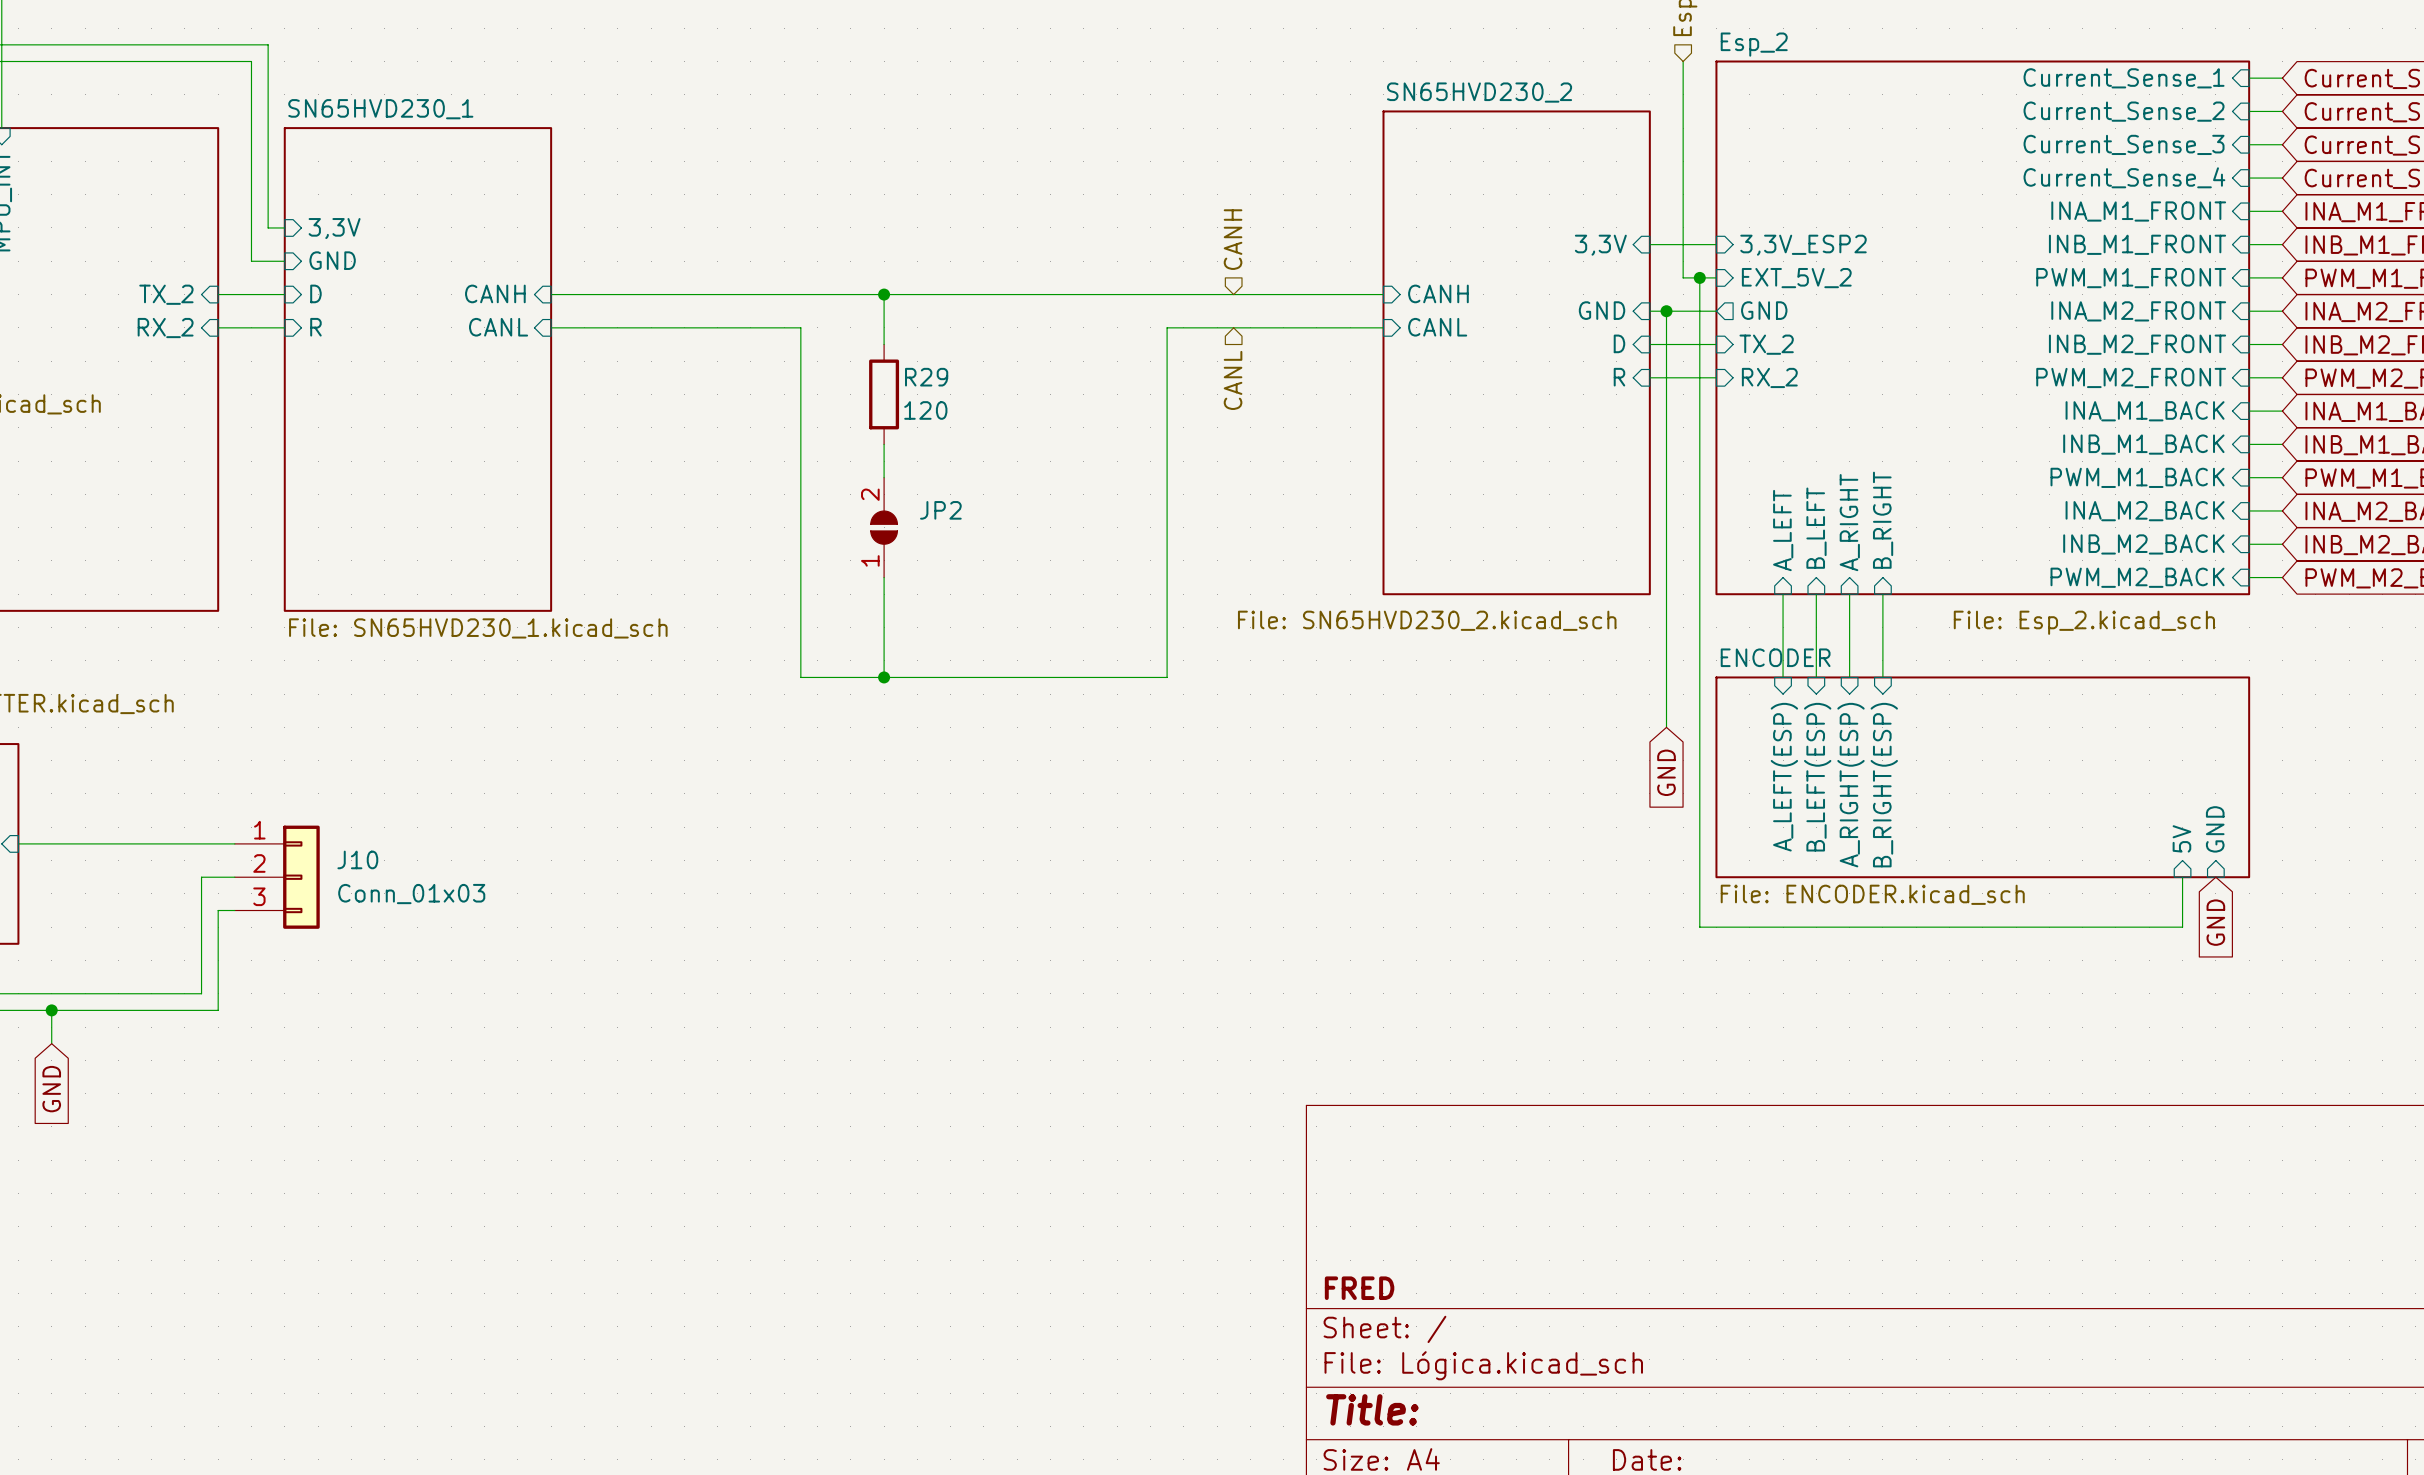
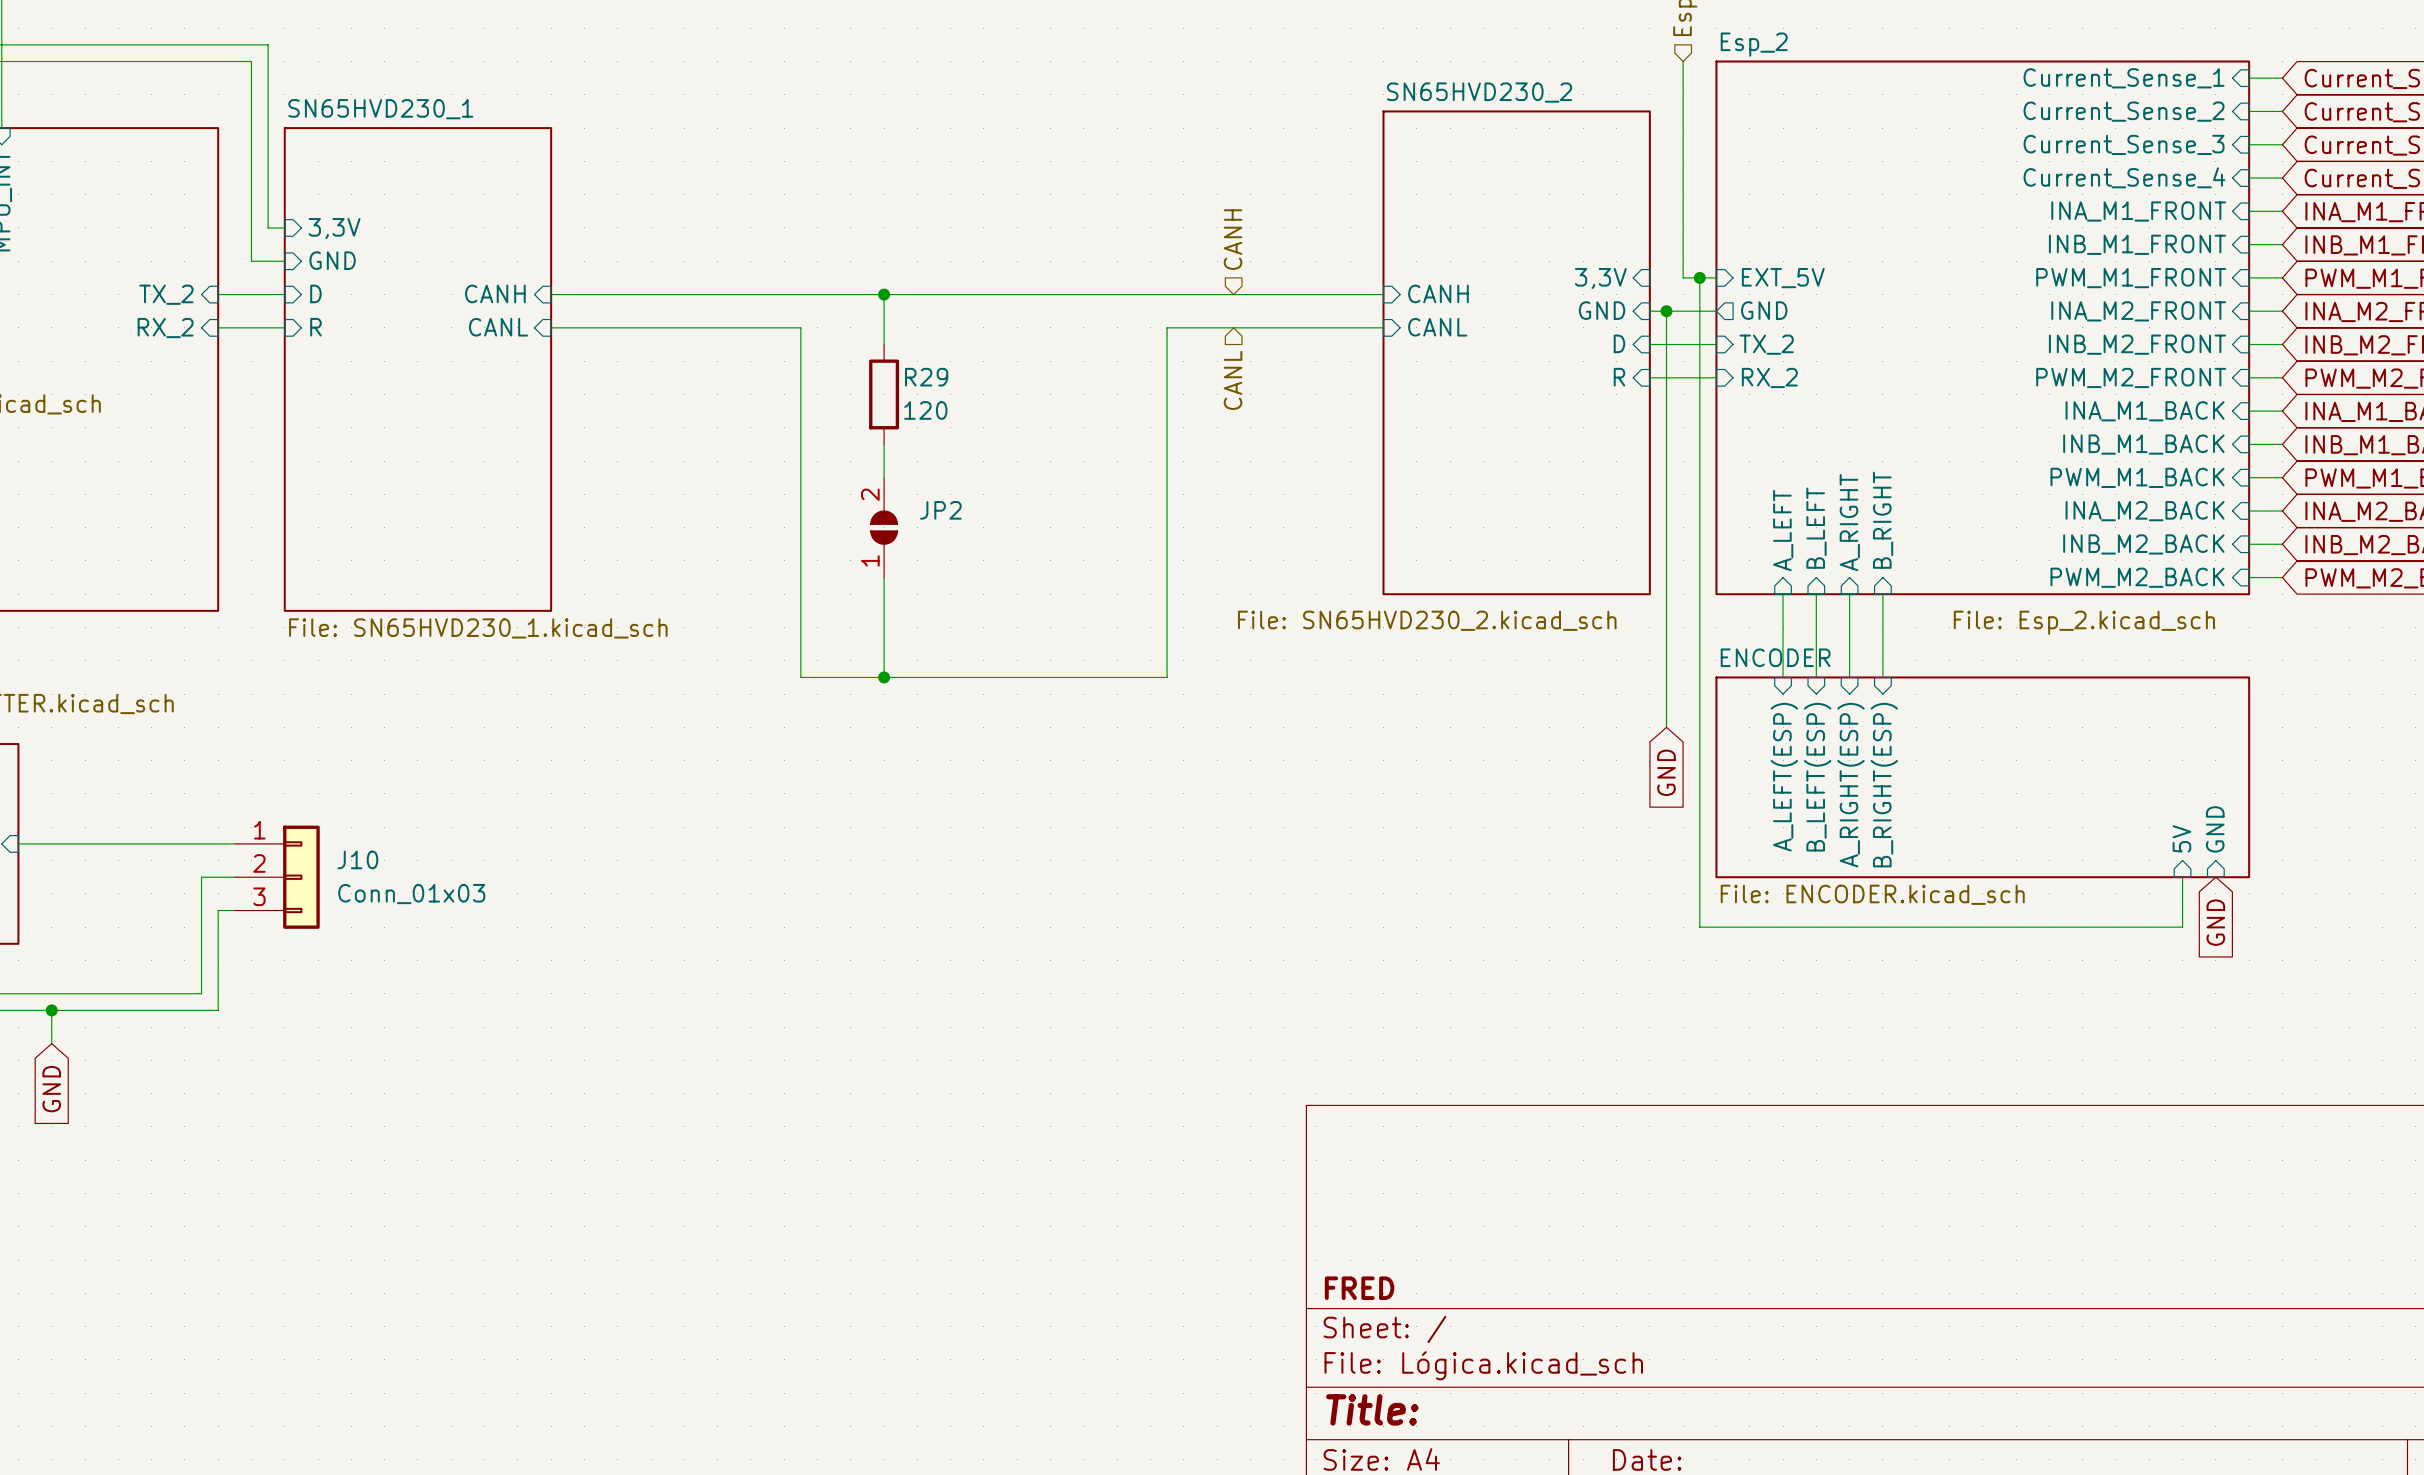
wire: (1649, 244) (1716, 244) -> none
sheet pin position: 3,3V (1600, 245) -> 3,3V (1600, 278)
sheet pin: 3,3V_ESP2 (1803, 245) -> none
sheet pin: EXT_5V_2 (1796, 278) -> EXT_5V (1783, 278)

